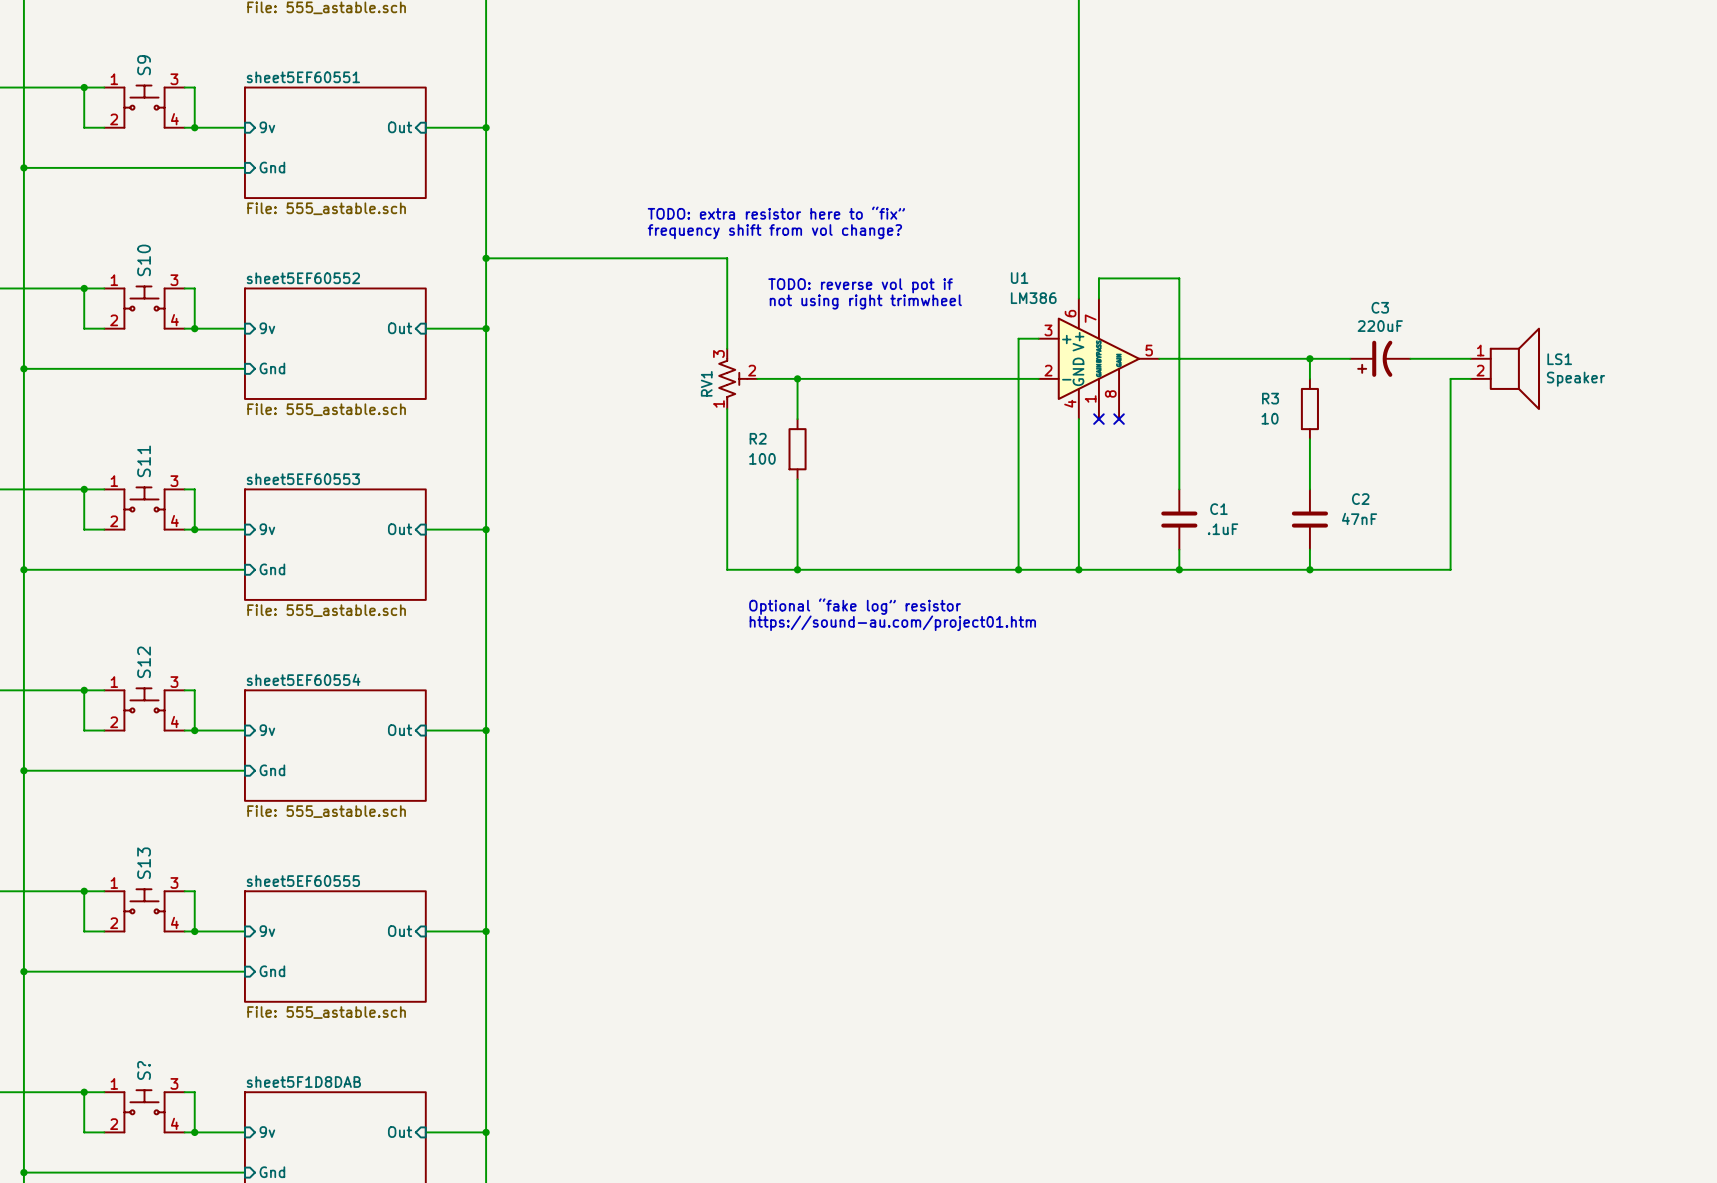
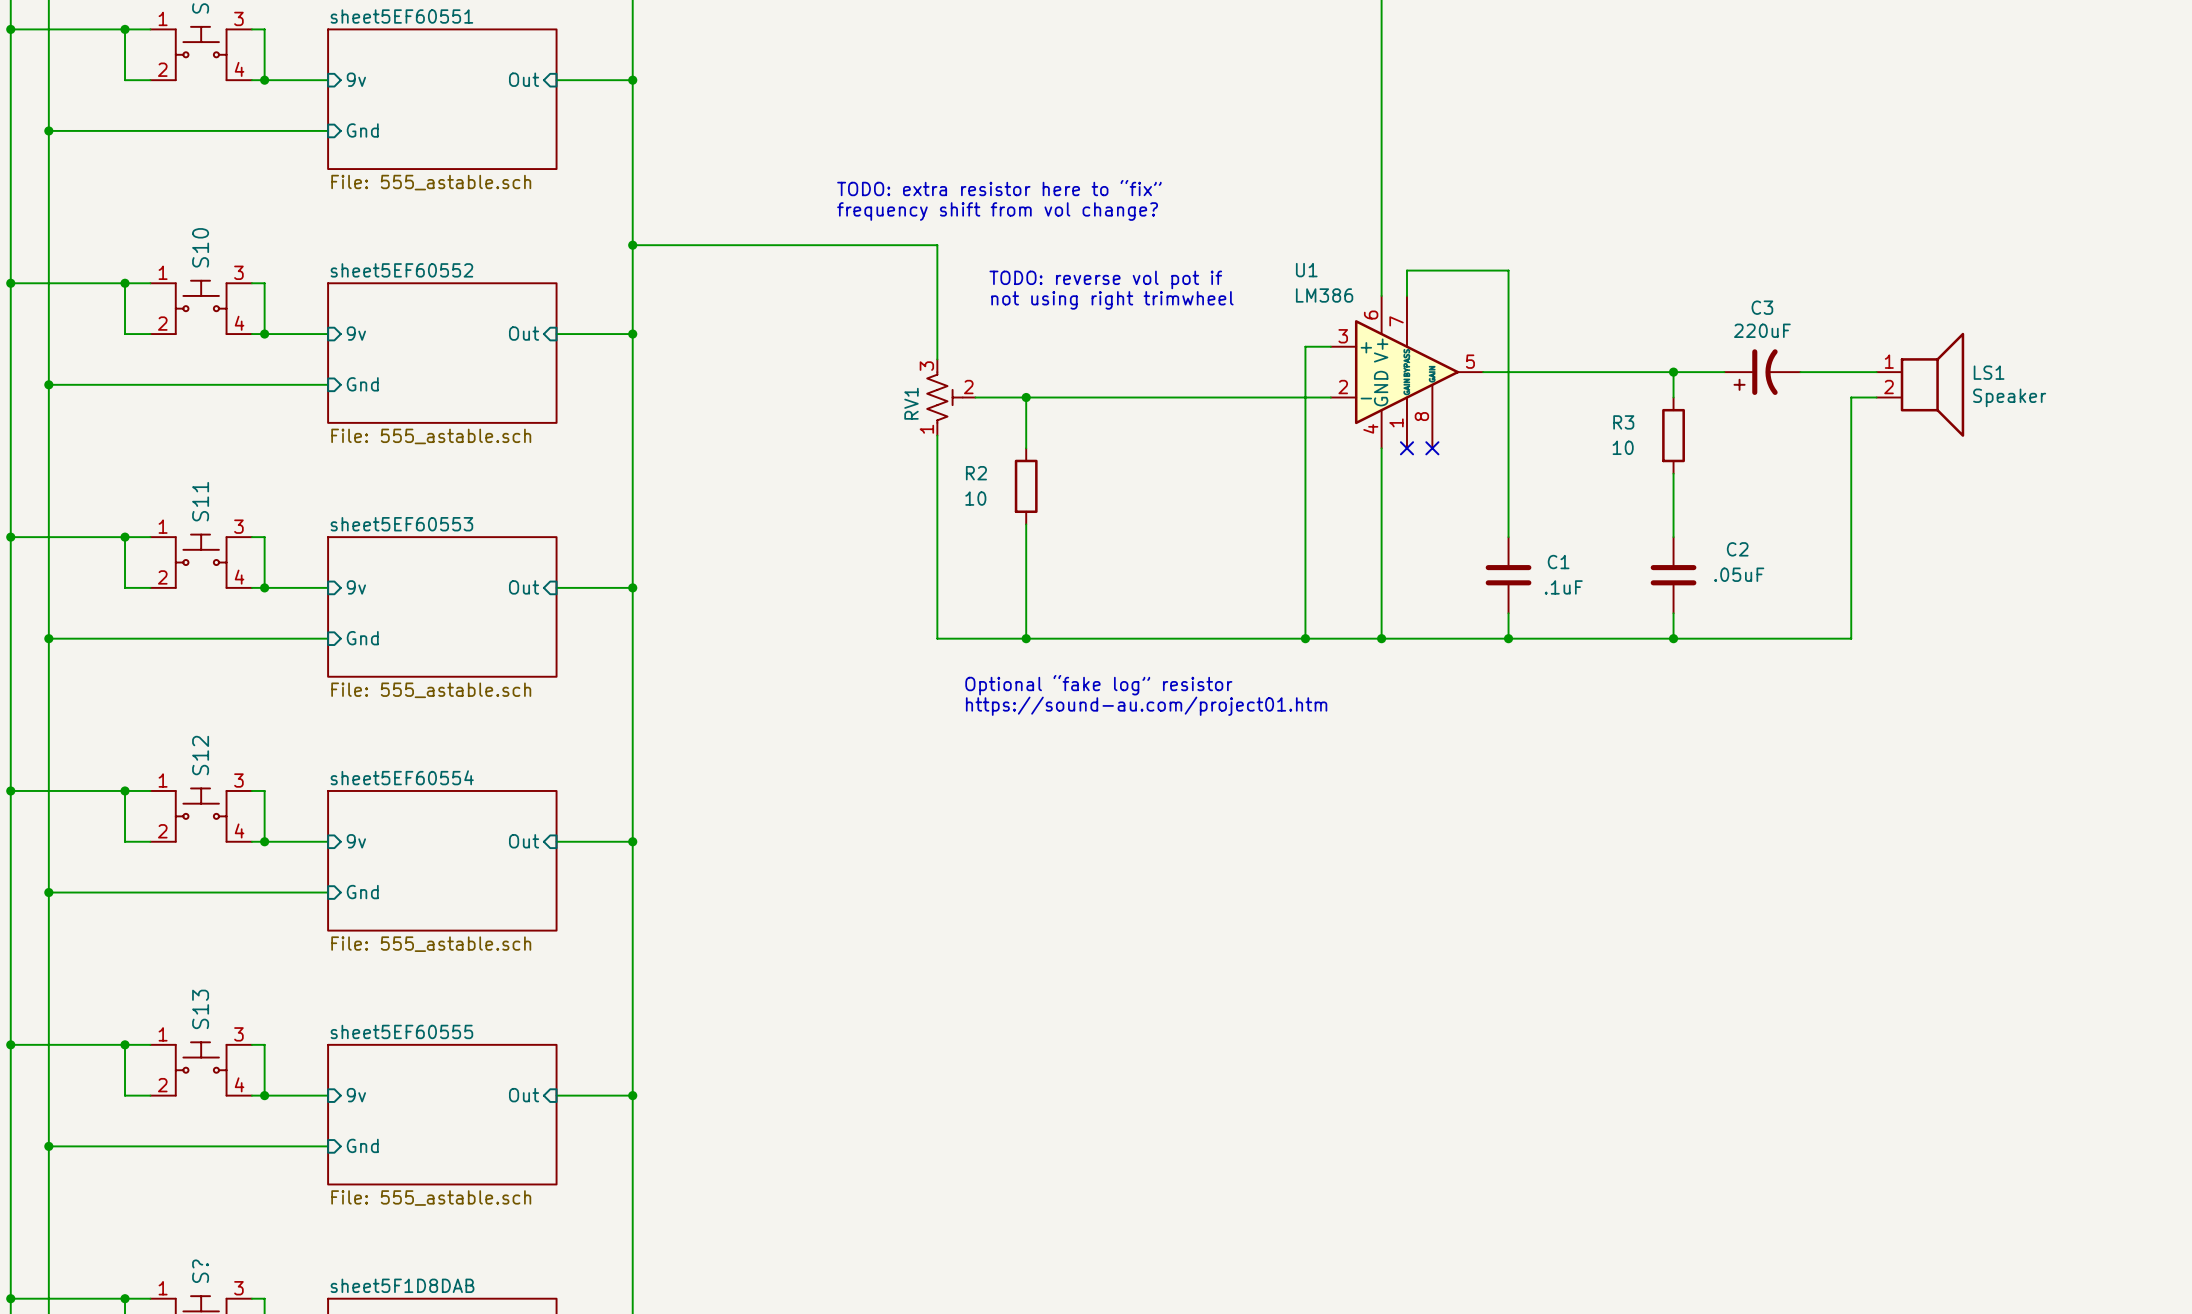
R2 value: 100 (762, 458) -> 10 (975, 498)
C2 value: 47nF (1359, 518) -> .05uF (1739, 574)

